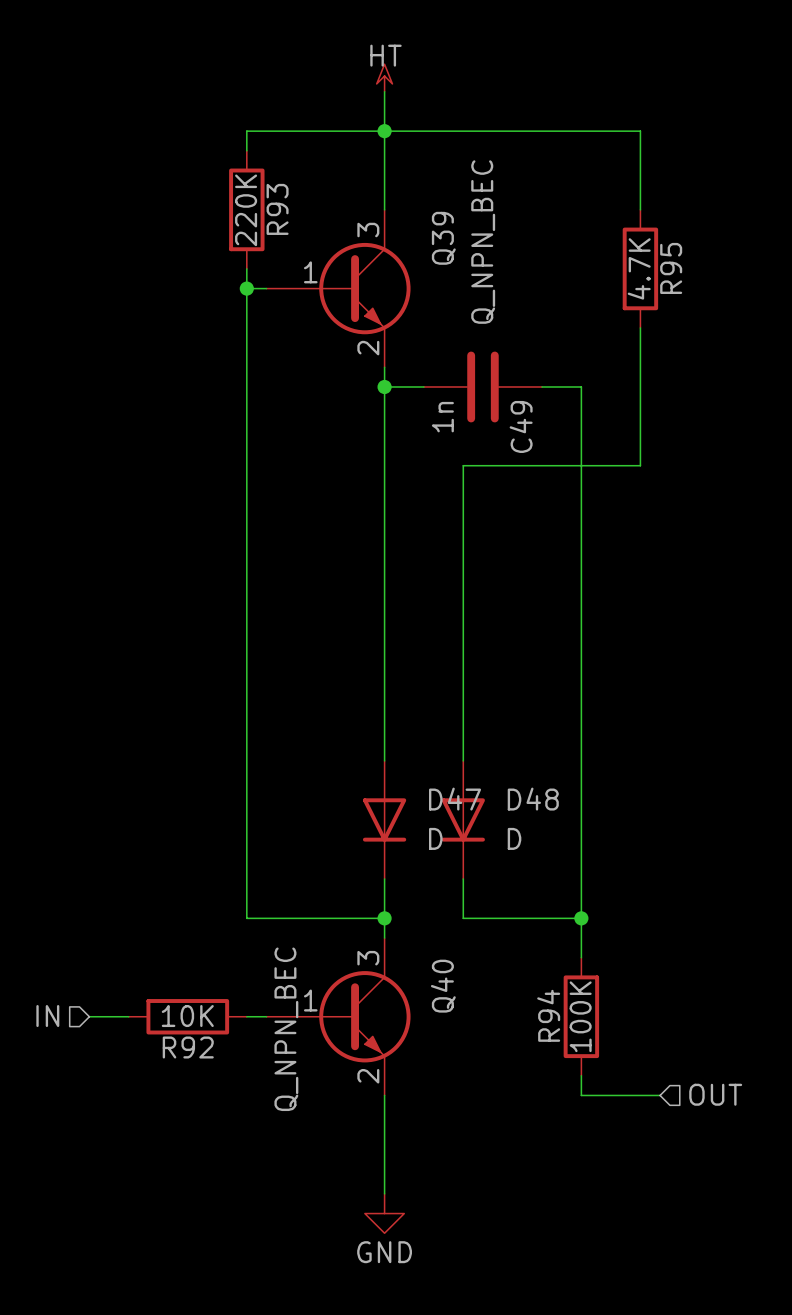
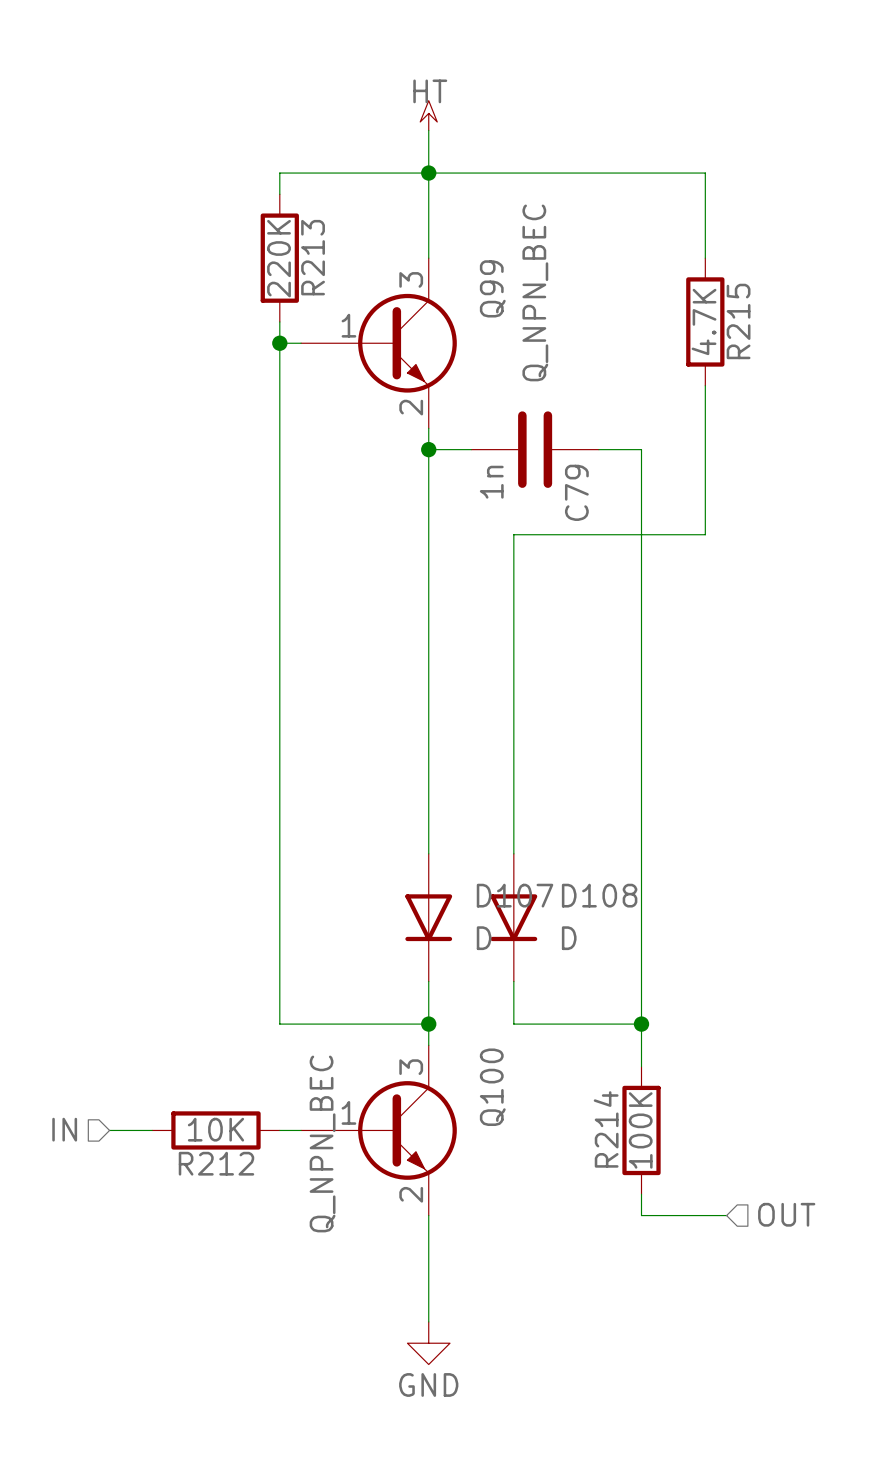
R93 name: R93 (277, 209) -> R213 (313, 257)
Q39 name: Q39 (443, 238) -> Q99 (492, 288)
R95 name: R95 (671, 268) -> R215 (738, 321)
C49 name: C49 (521, 426) -> C79 (576, 492)
D47 name: D47 (455, 799) -> D107 (515, 895)
D48 name: D48 (533, 799) -> D108 (599, 895)
Q40 name: Q40 (443, 986) -> Q100 (492, 1087)
R94 name: R94 (548, 1015) -> R214 (606, 1129)
R92 name: R92 (188, 1047) -> R212 (216, 1163)

